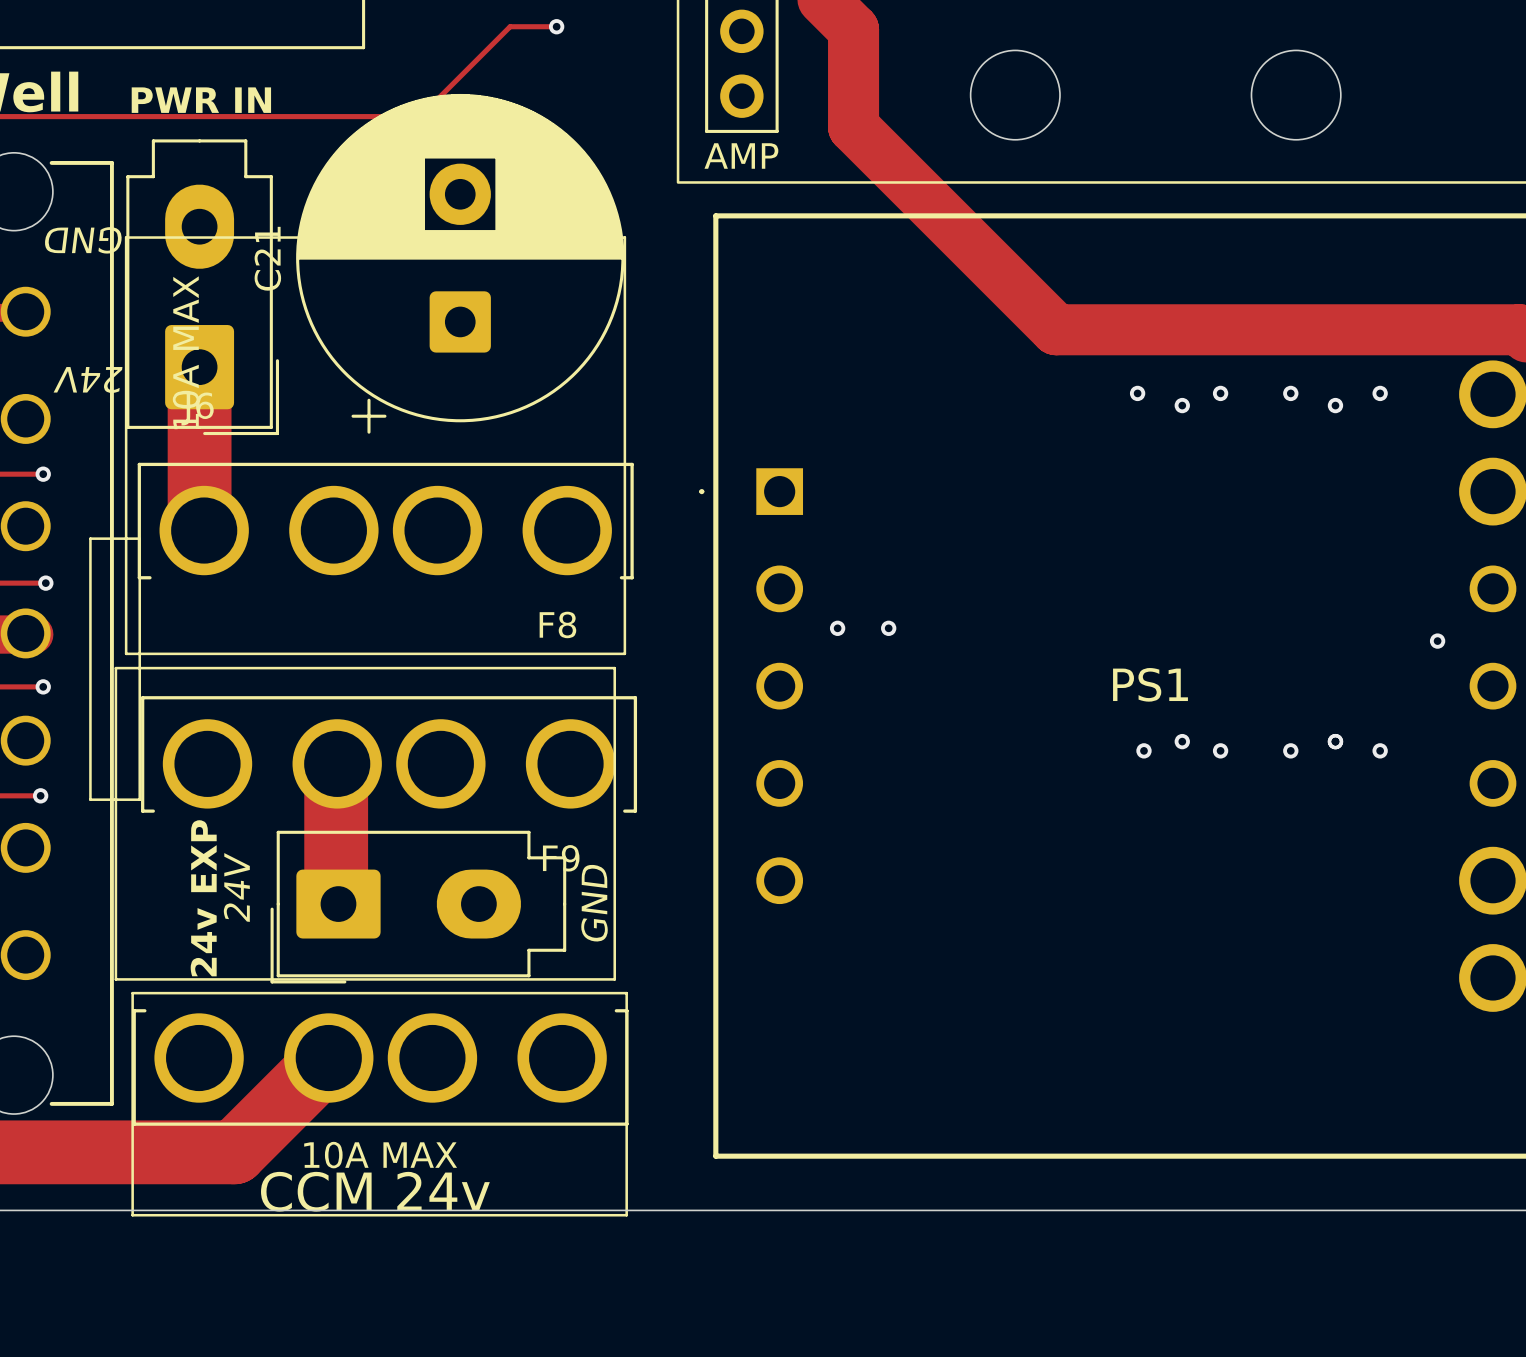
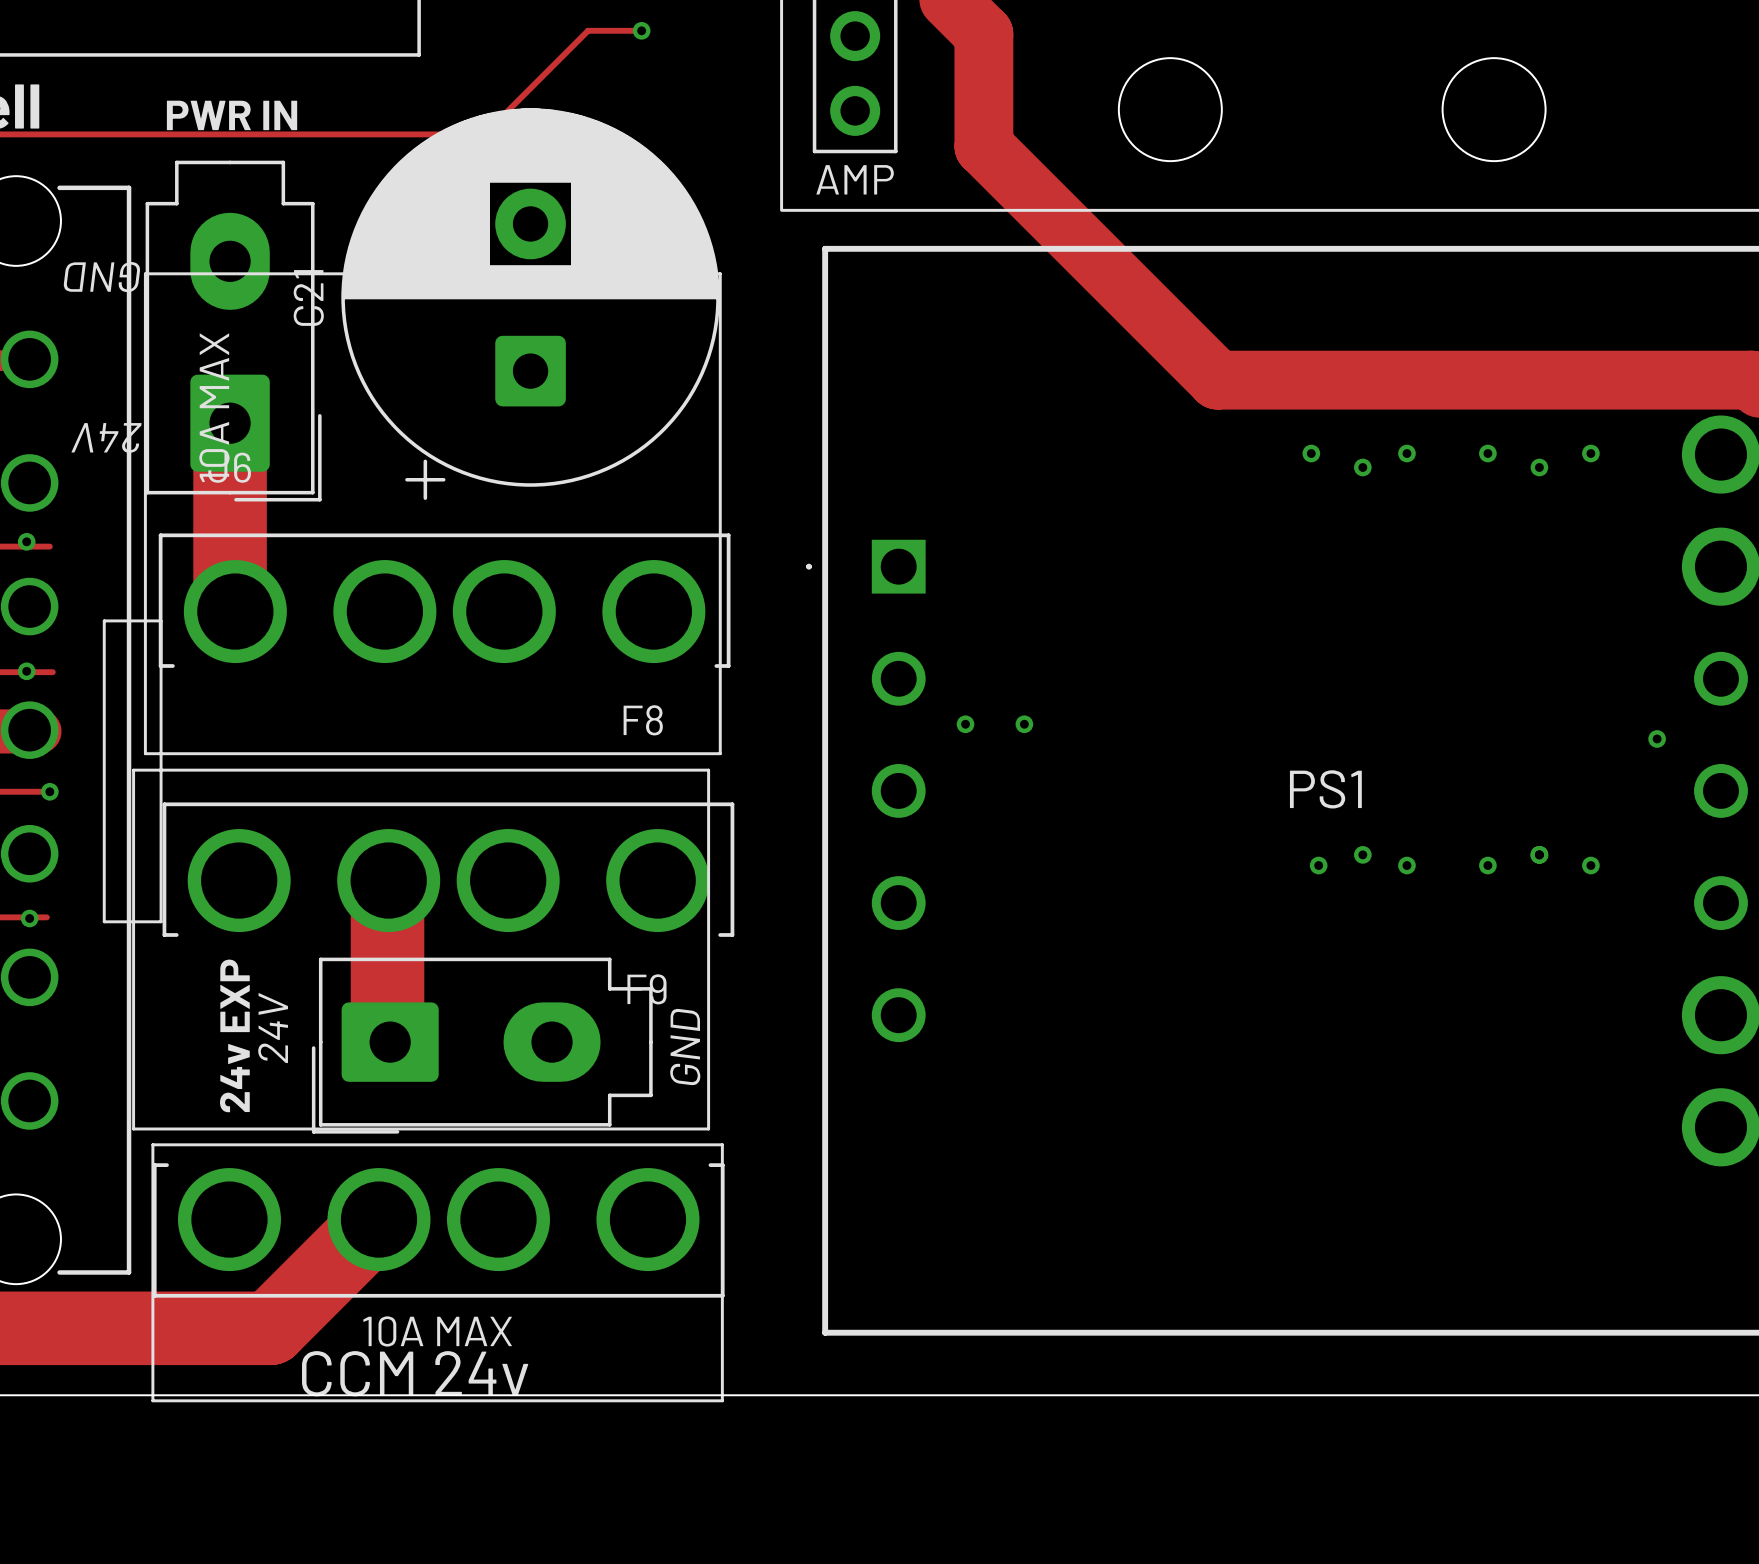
via position: (43, 474) -> (26, 541)
via position: (45, 583) -> (26, 671)
via position: (40, 795) -> (29, 918)

